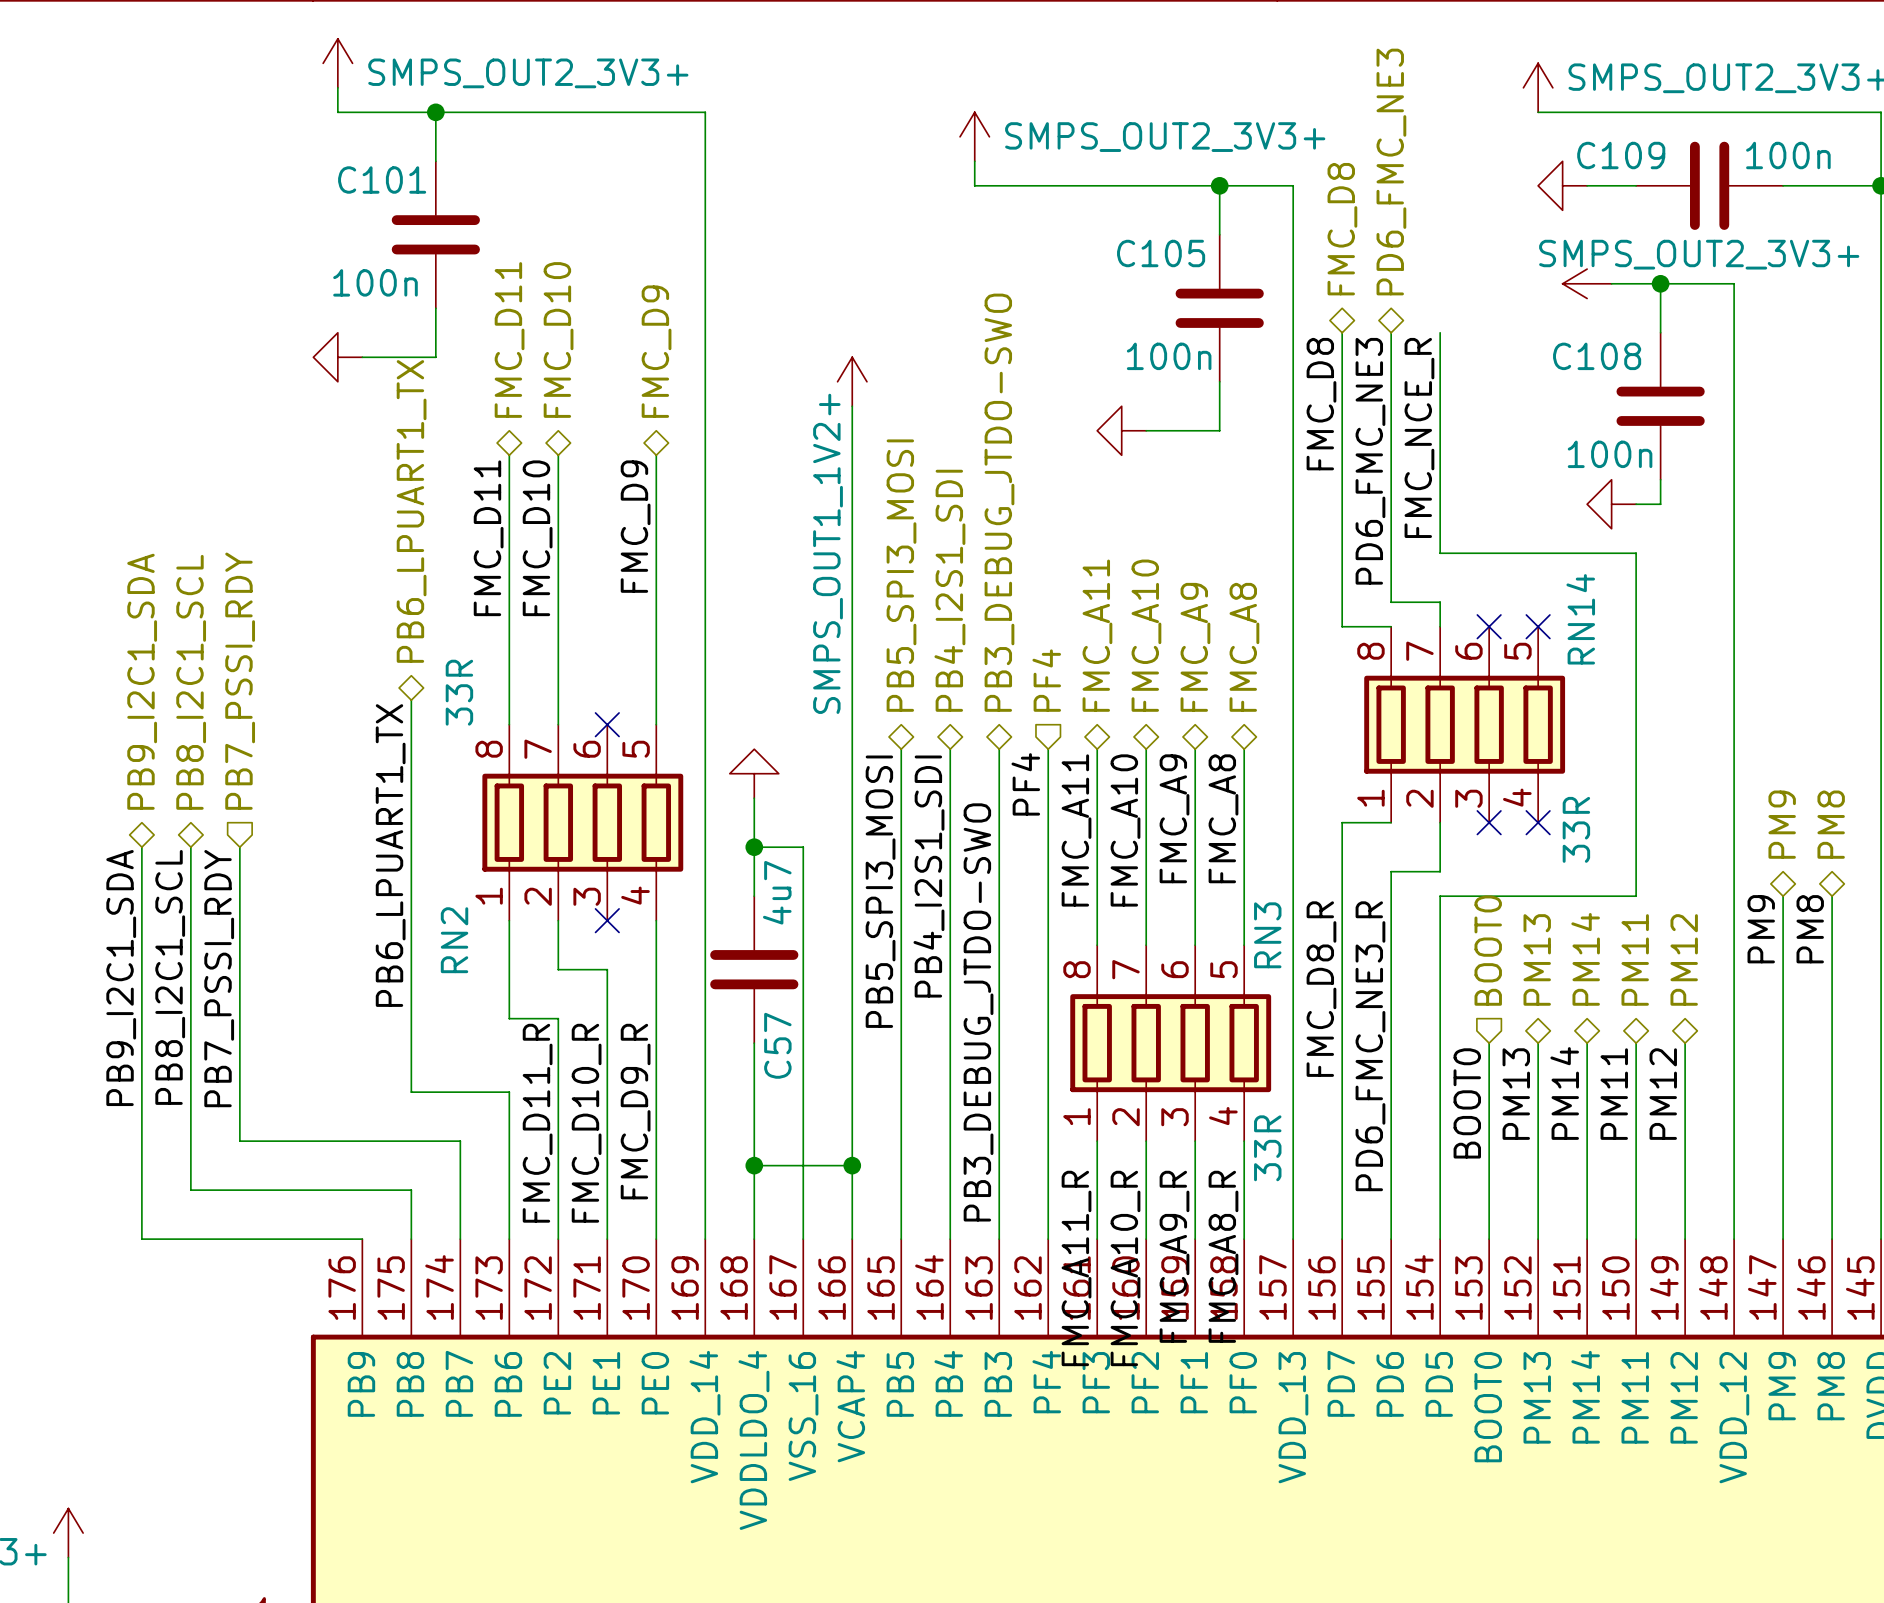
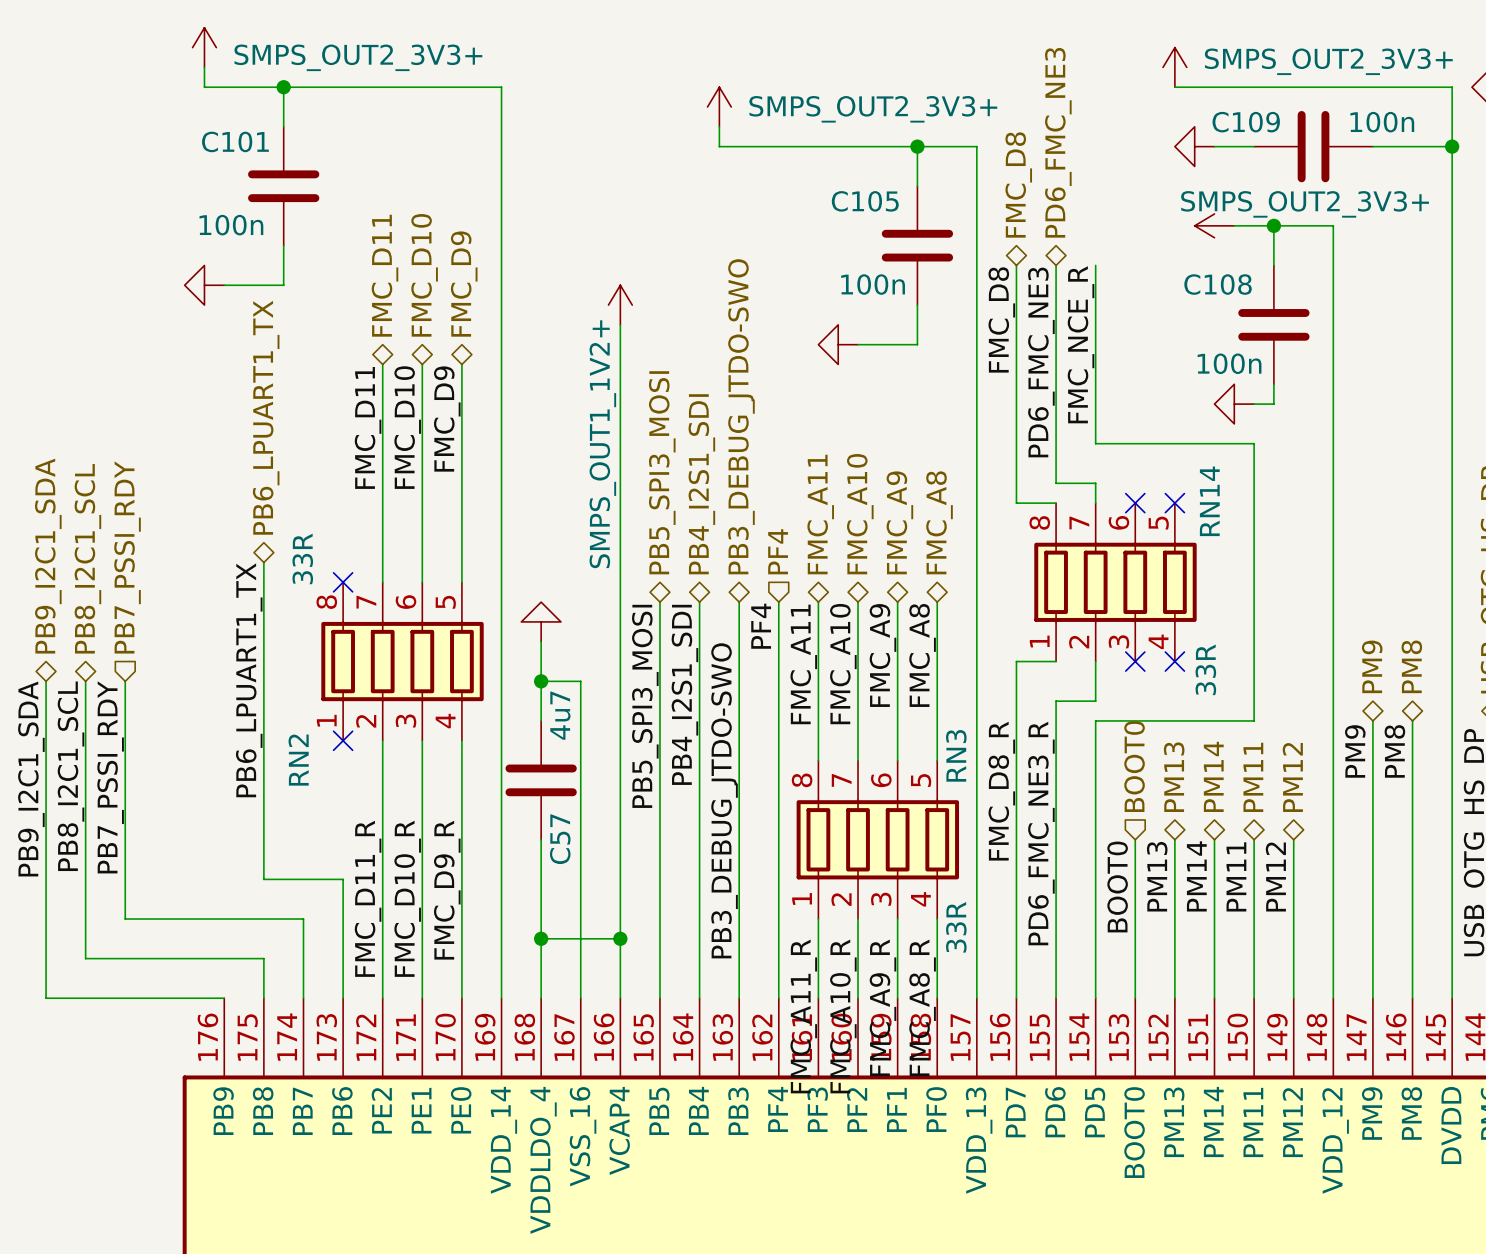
hierarchical label: FMC_D11 (509, 339) -> none
hierarchical label: FMC_D10 (558, 339) -> FMC_D11 (384, 275)
hierarchical label: none -> FMC_D10 (424, 275)
wire: (509, 455) (509, 724) -> (422, 364) (422, 582)
label: FMC_D11 (488, 538) -> none
label: FMC_D10 (537, 538) -> FMC_D11 (368, 427)
label: none -> FMC_D10 (407, 427)
no-connect mark position: (607, 724) -> (343, 582)
wire: (509, 920) (509, 1018) (558, 1018) -> (382, 780) (382, 819)
no-connect mark position: (607, 920) -> (343, 740)
wire: (558, 969) (607, 969) -> (422, 740) (422, 780)

